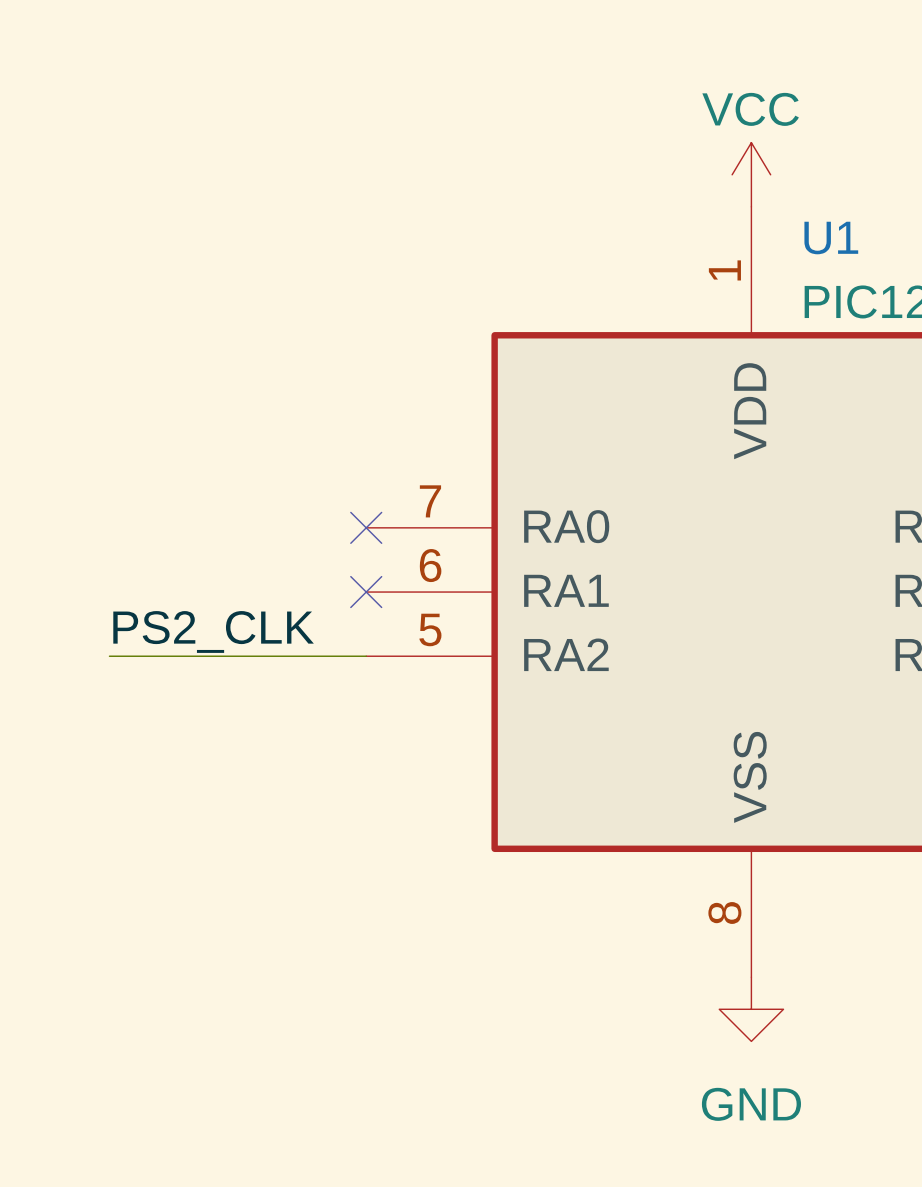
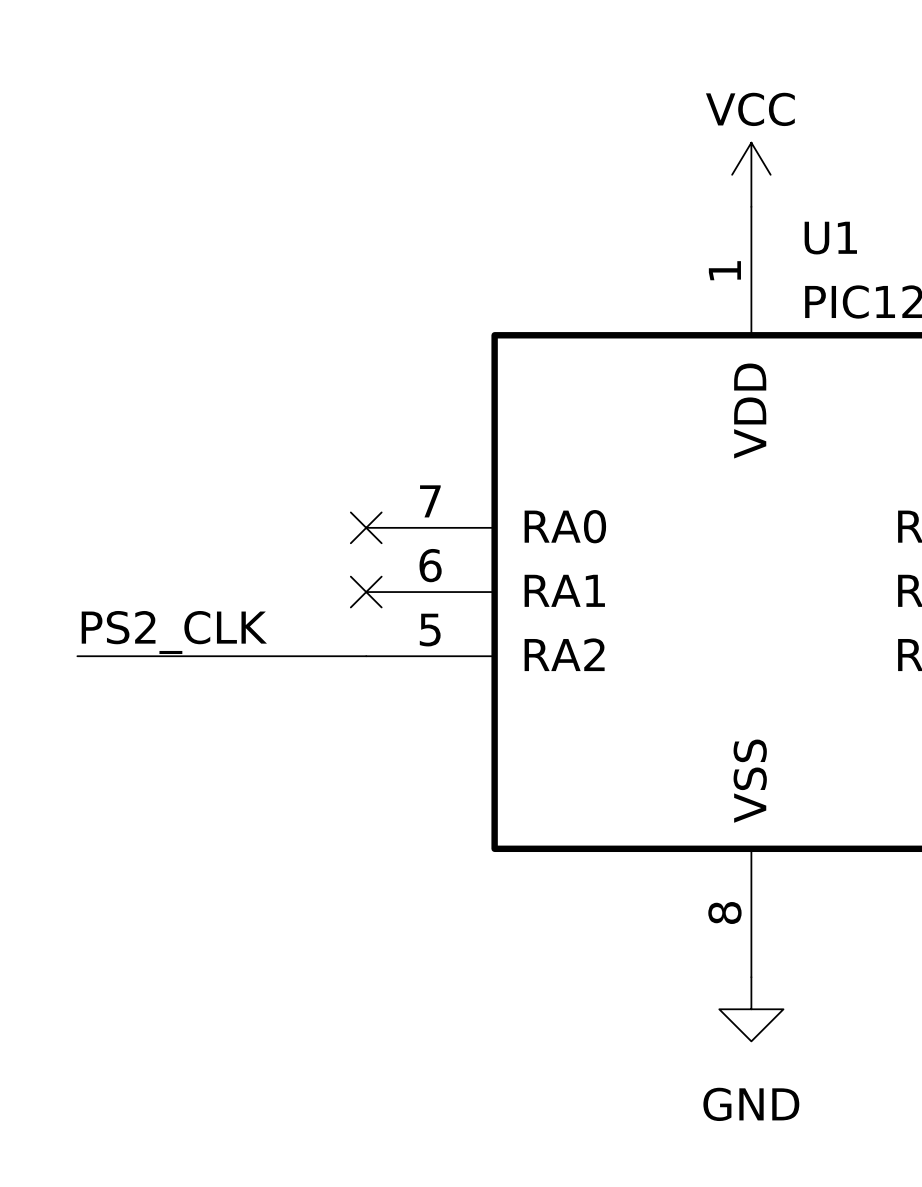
label position: PS2_CLK (213, 631) -> PS2_CLK (174, 632)
wire: none -> (77, 656) (109, 656)

